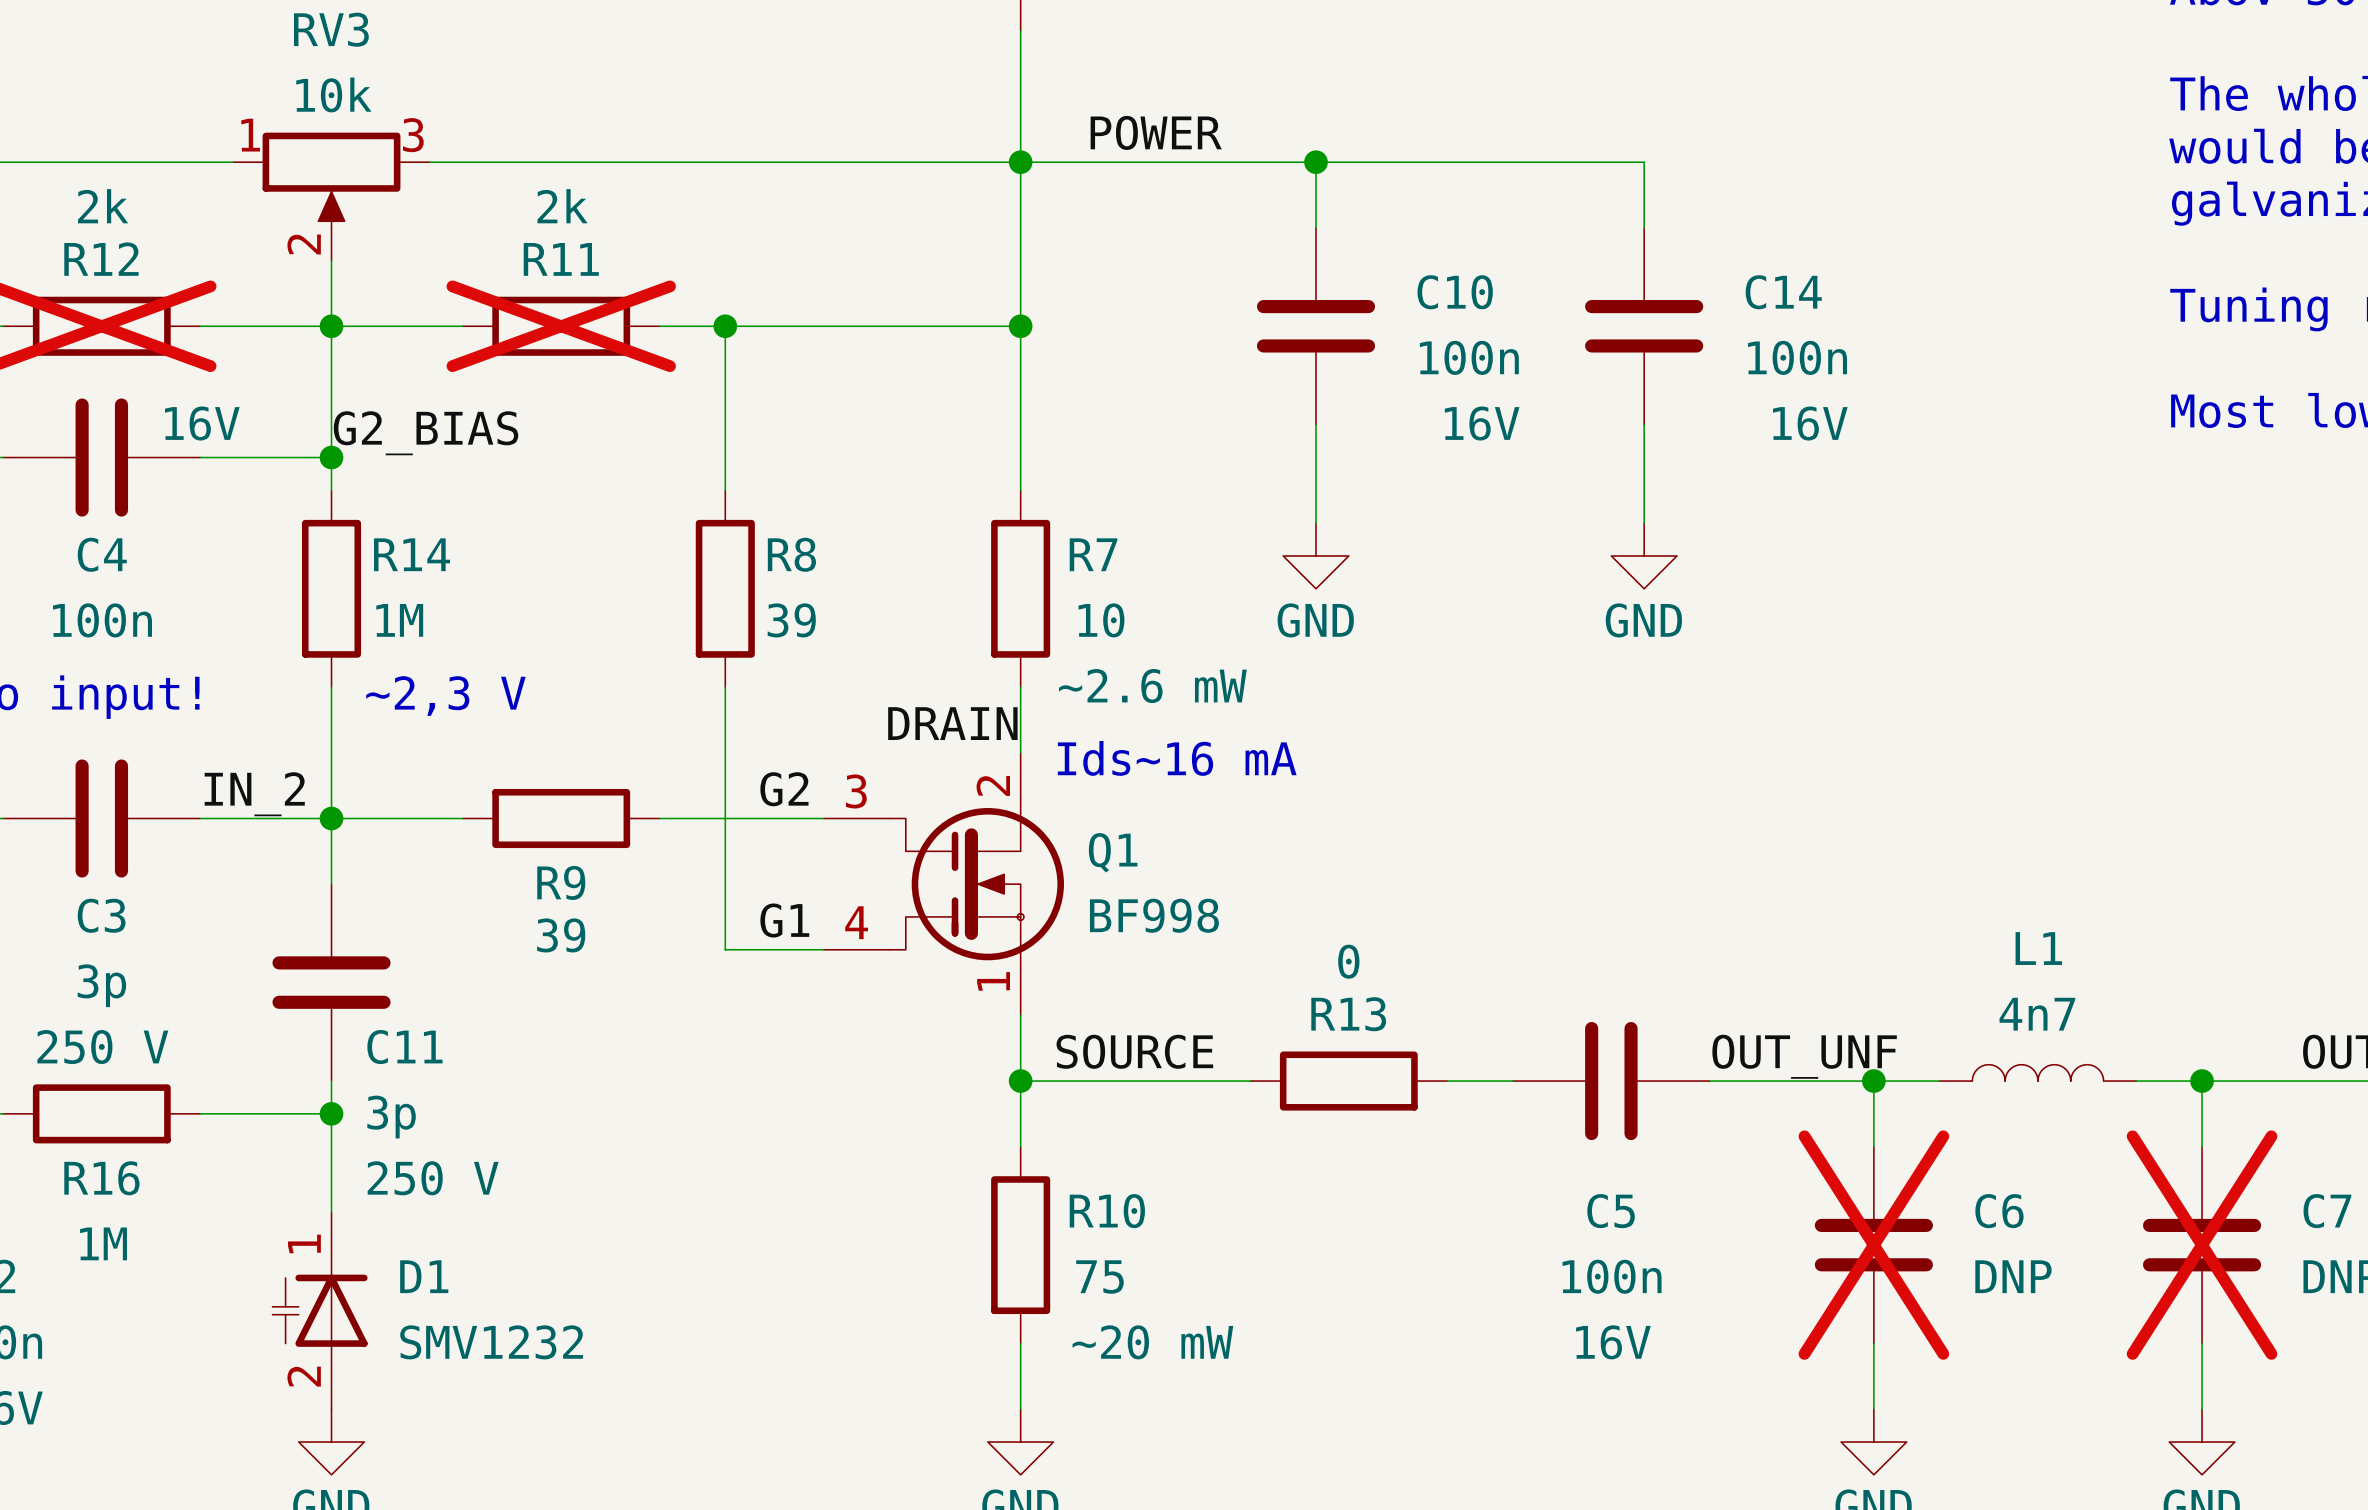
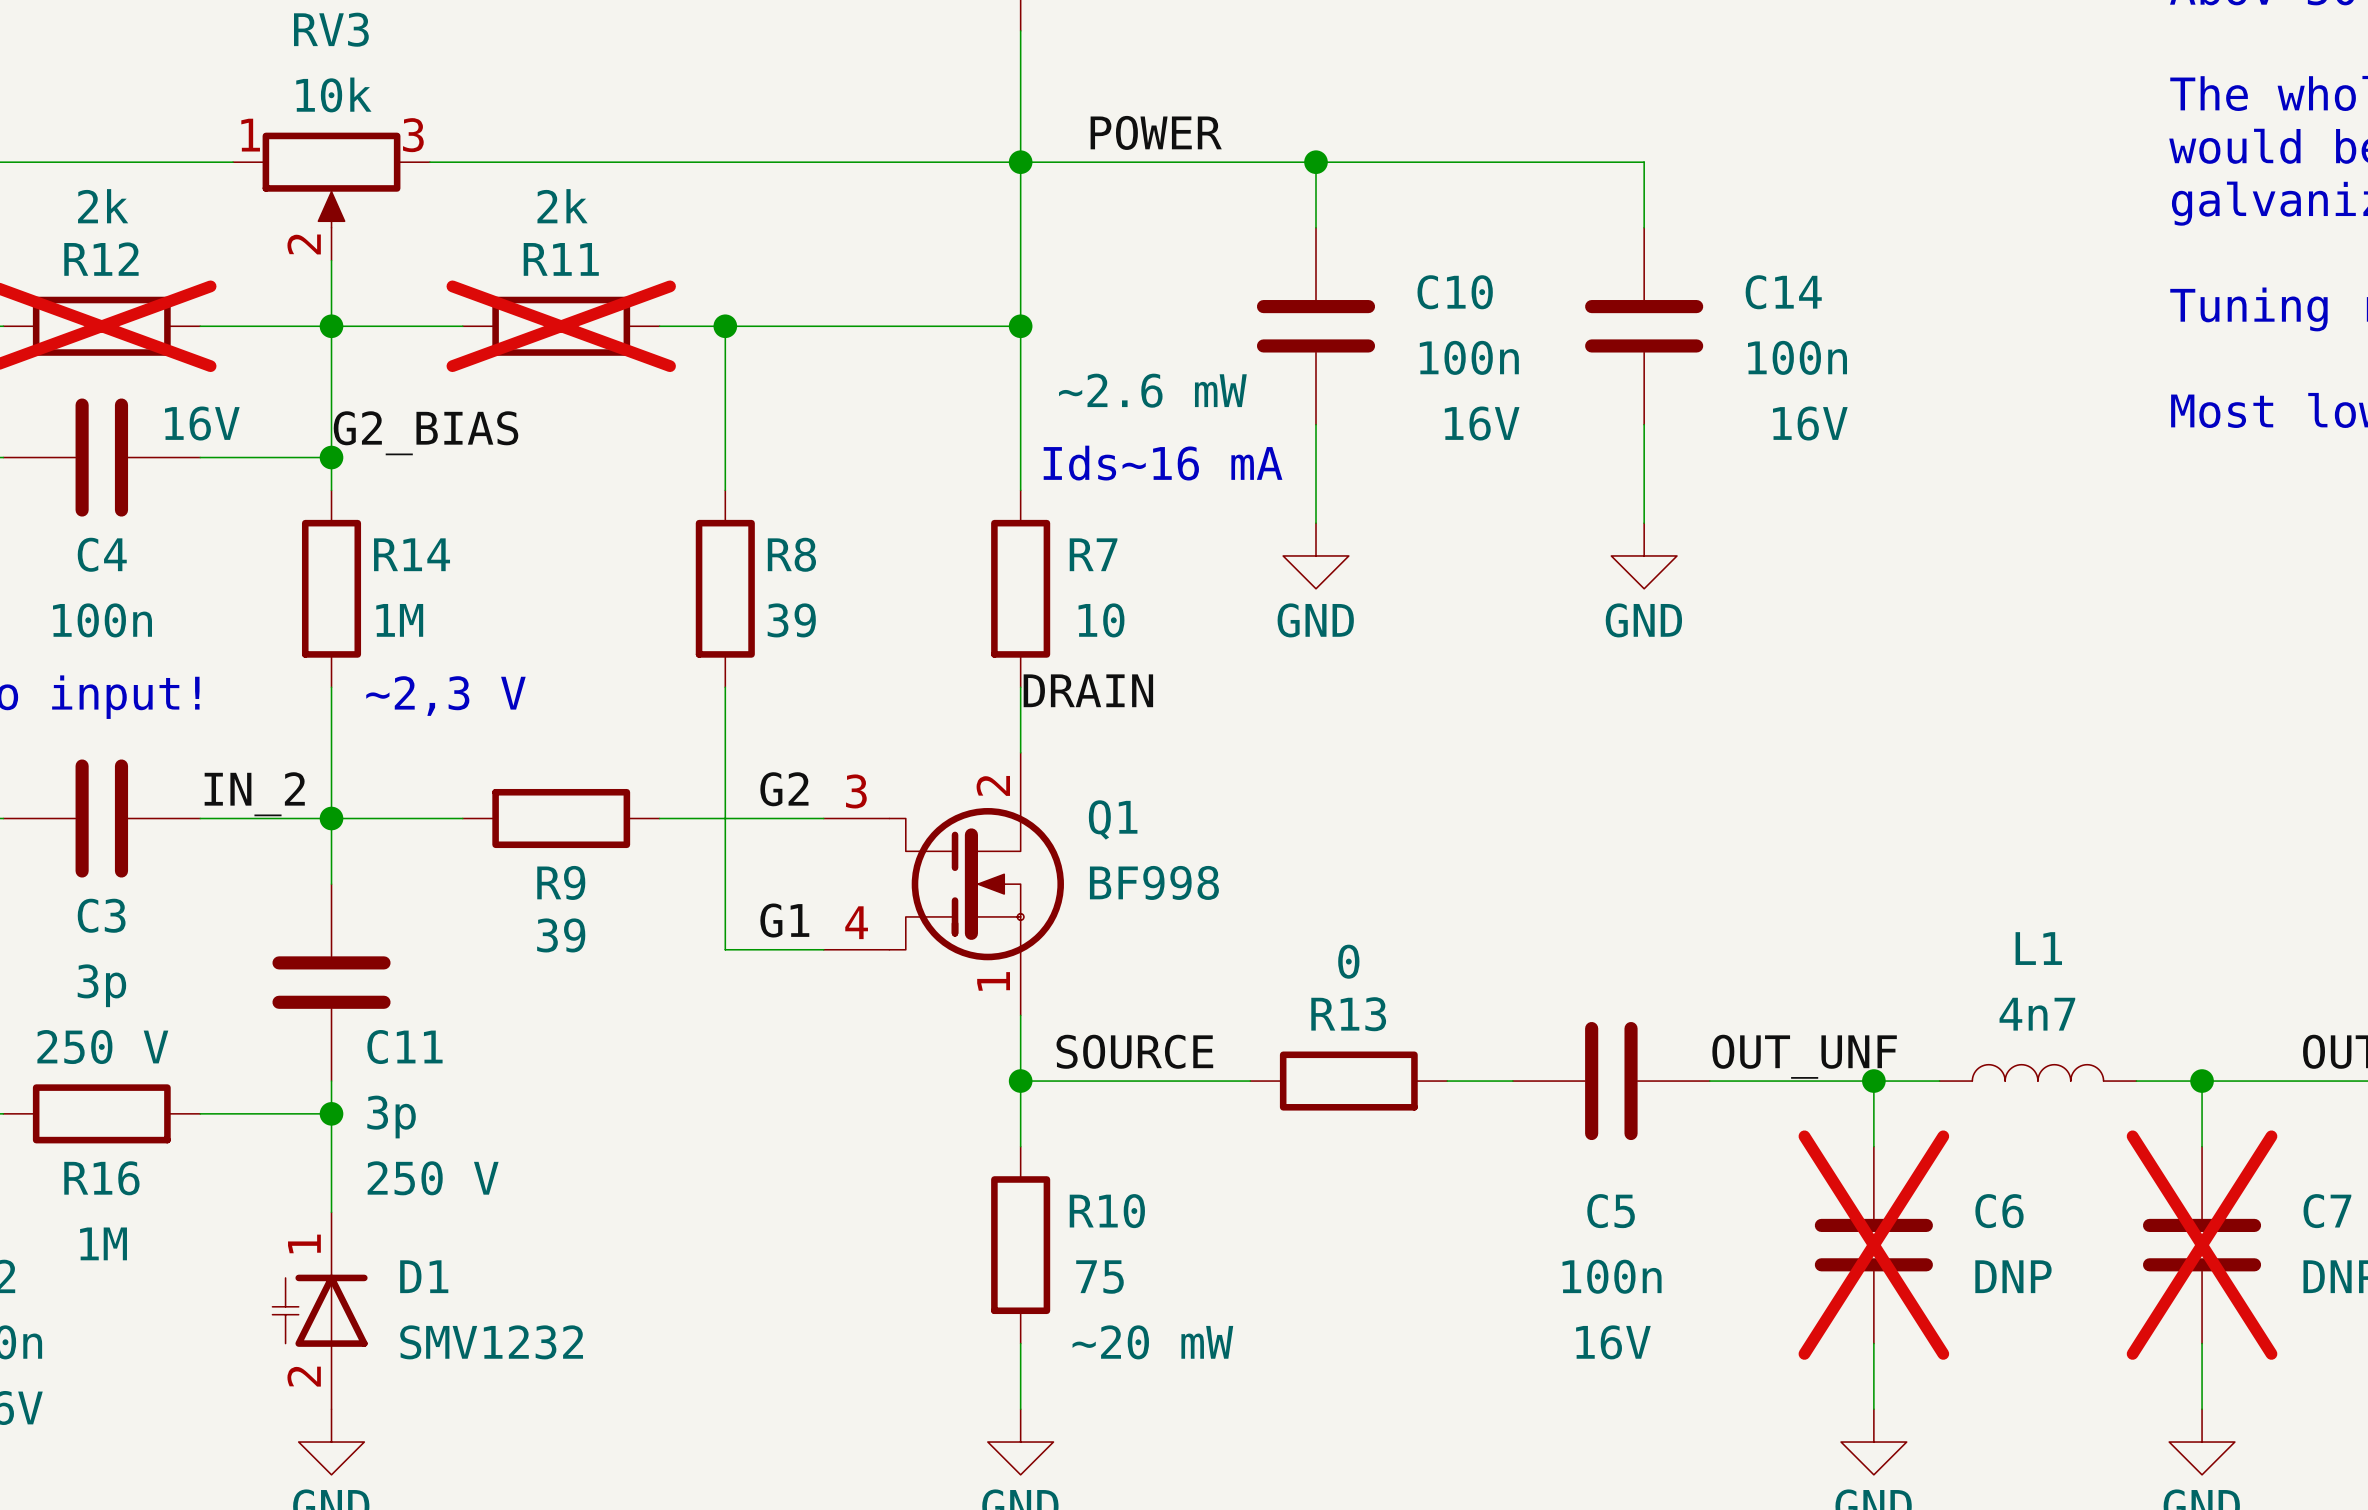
R7 text position: ~2.6 mW (1152, 686) -> ~2.6 mW (1152, 390)
label position: DRAIN (952, 723) -> DRAIN (1088, 690)
text position: Ids~16 mA (1177, 758) -> Ids~16 mA (1163, 463)
Q1 name position: Q1 (1113, 852) -> Q1 (1113, 819)
Q1 value position: BF998 (1154, 915) -> BF998 (1154, 882)

